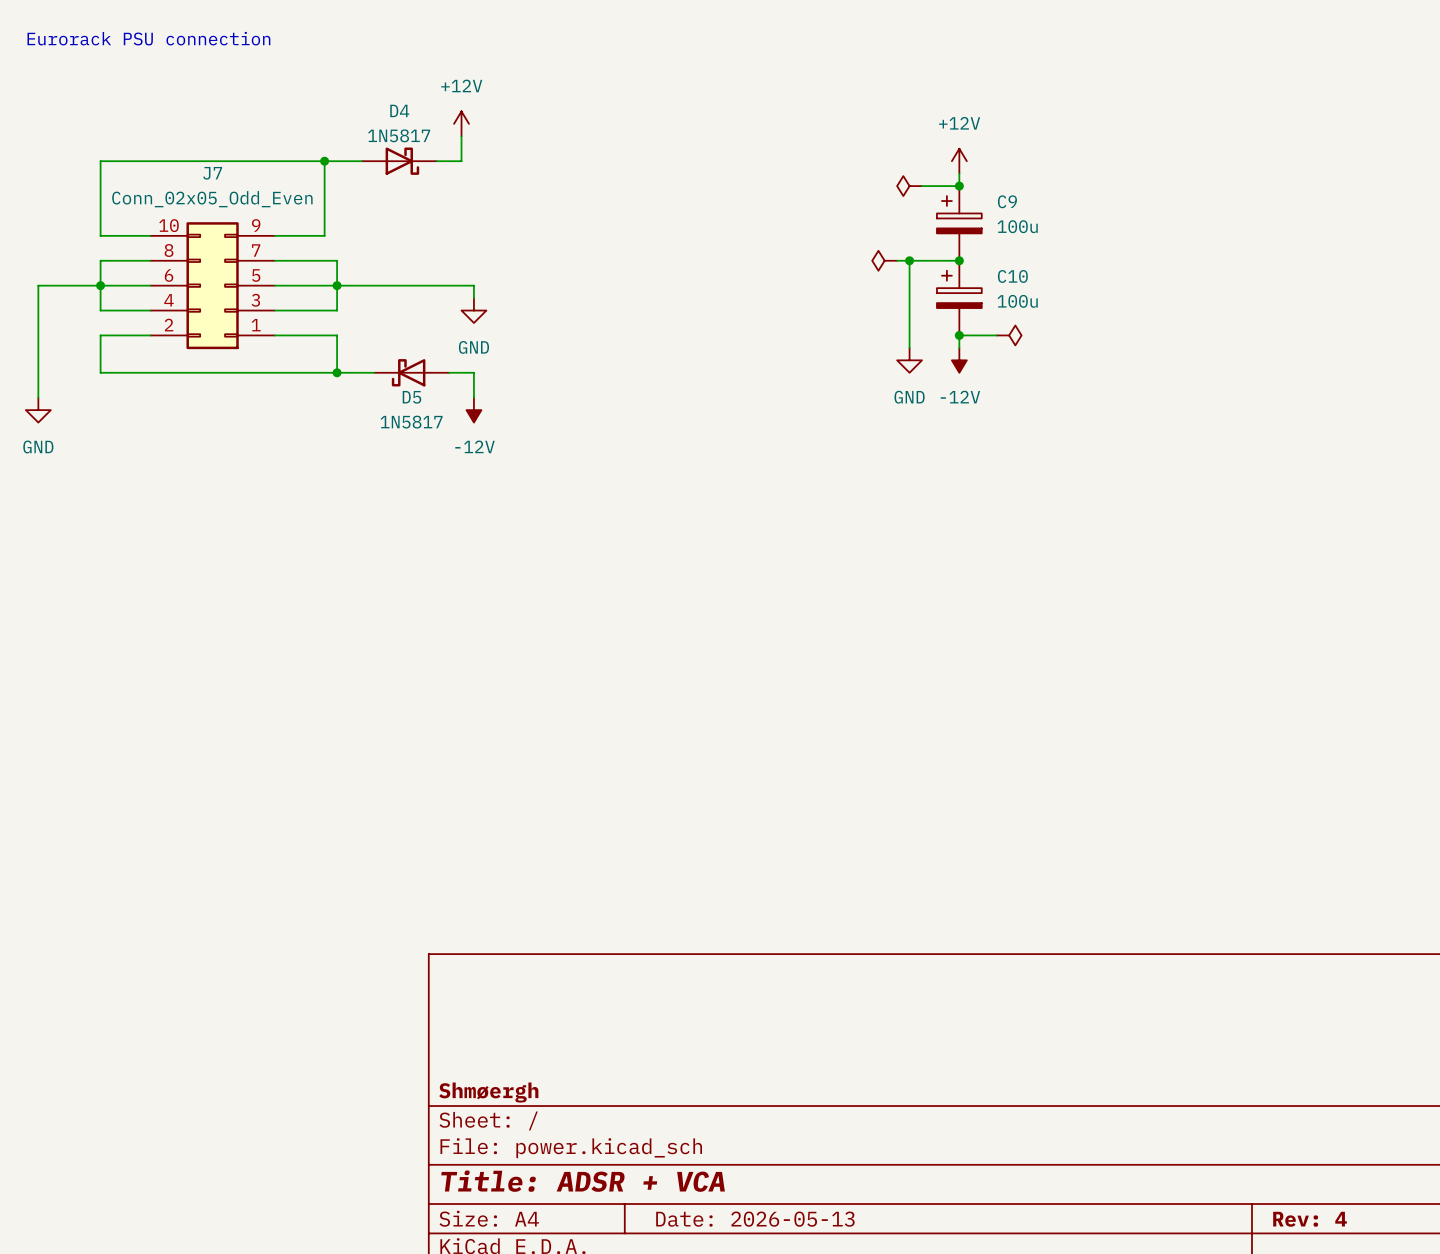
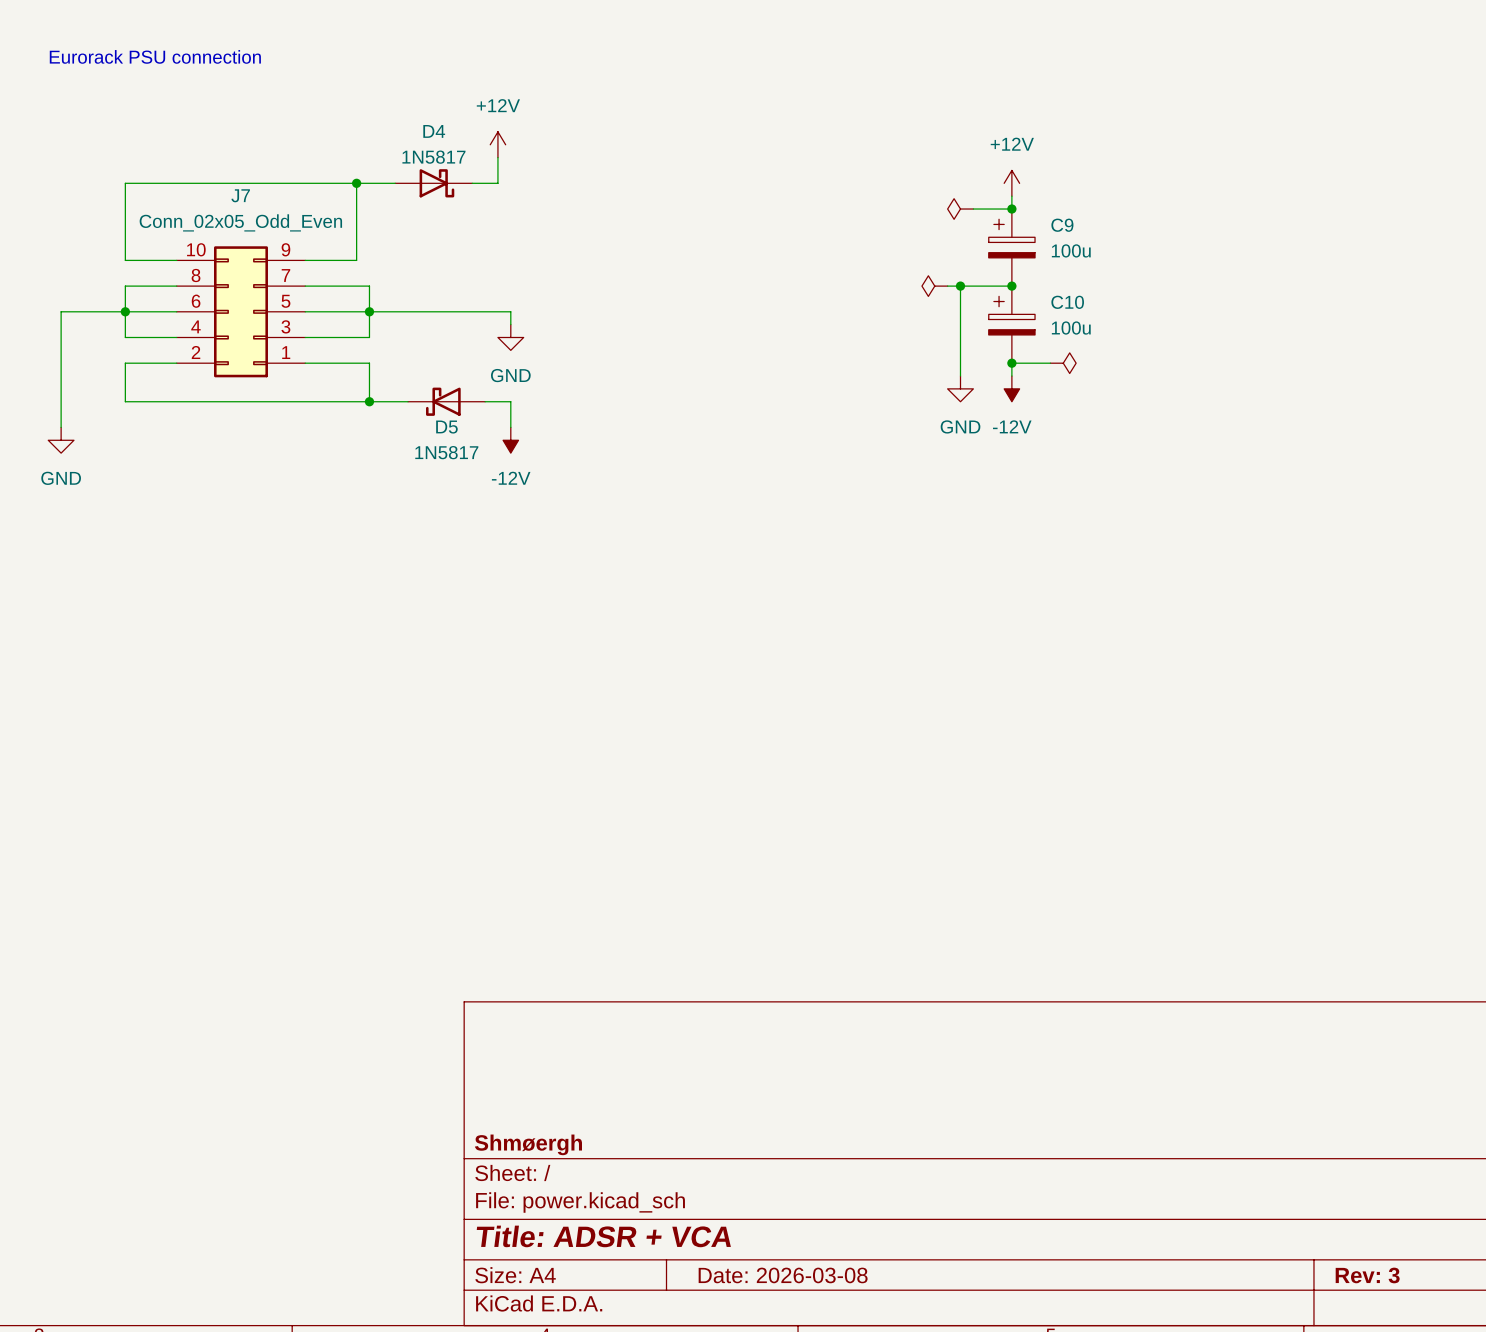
title block: Date: 2026-05-13 (755, 1219) -> Date: 2026-03-08 (783, 1275)
title block: Rev: 4 (1310, 1219) -> Rev: 3 (1367, 1275)

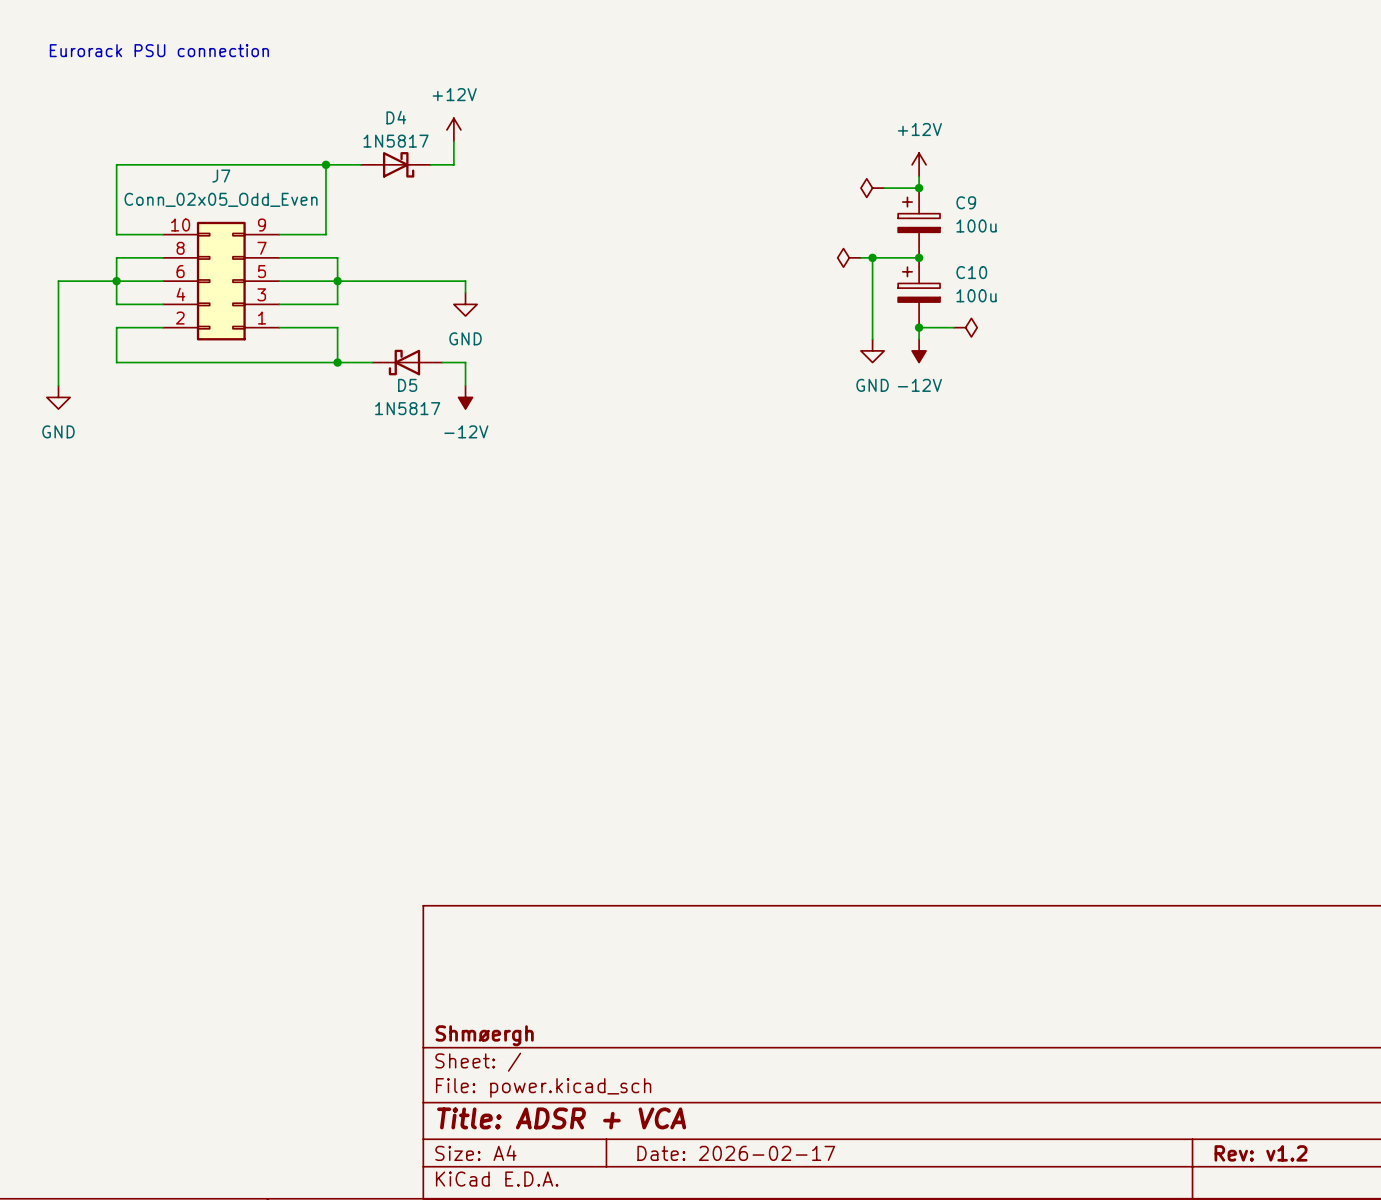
title block: Date: 2026-03-08 (783, 1275) -> Date: 2026-02-17 (736, 1153)
title block: Rev: 3 (1367, 1275) -> Rev: v1.2 (1261, 1153)

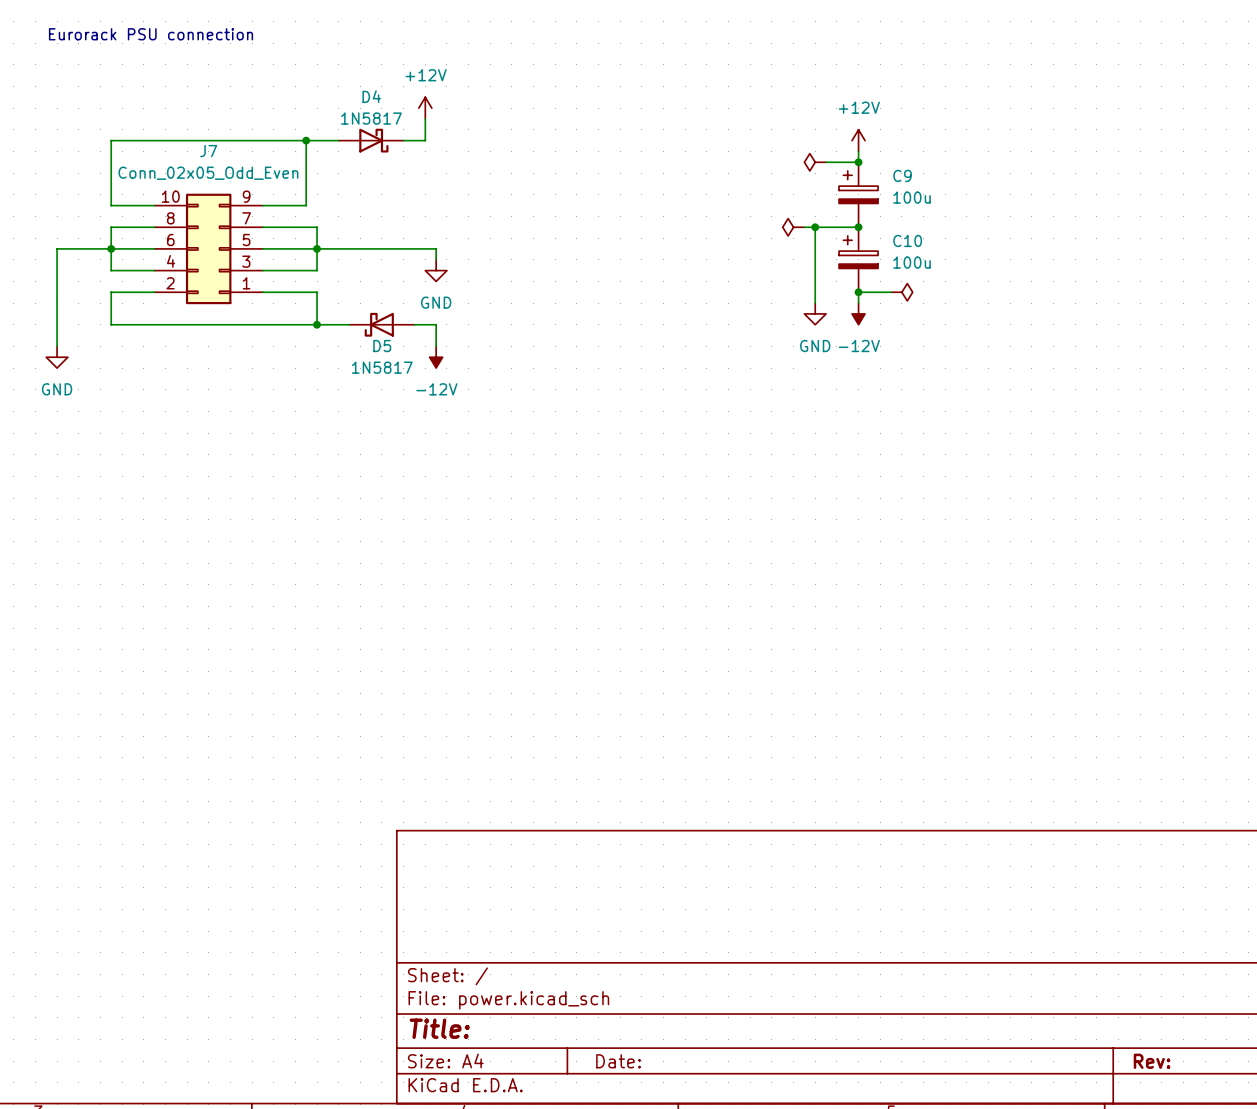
title block: Shmøergh (484, 1035) -> none
title block: Title: ADSR + VCA (561, 1118) -> Title: (439, 1028)
title block: Date: 2026-02-17 (736, 1153) -> Date: (618, 1061)
title block: Rev: v1.2 (1261, 1153) -> Rev: (1152, 1061)

